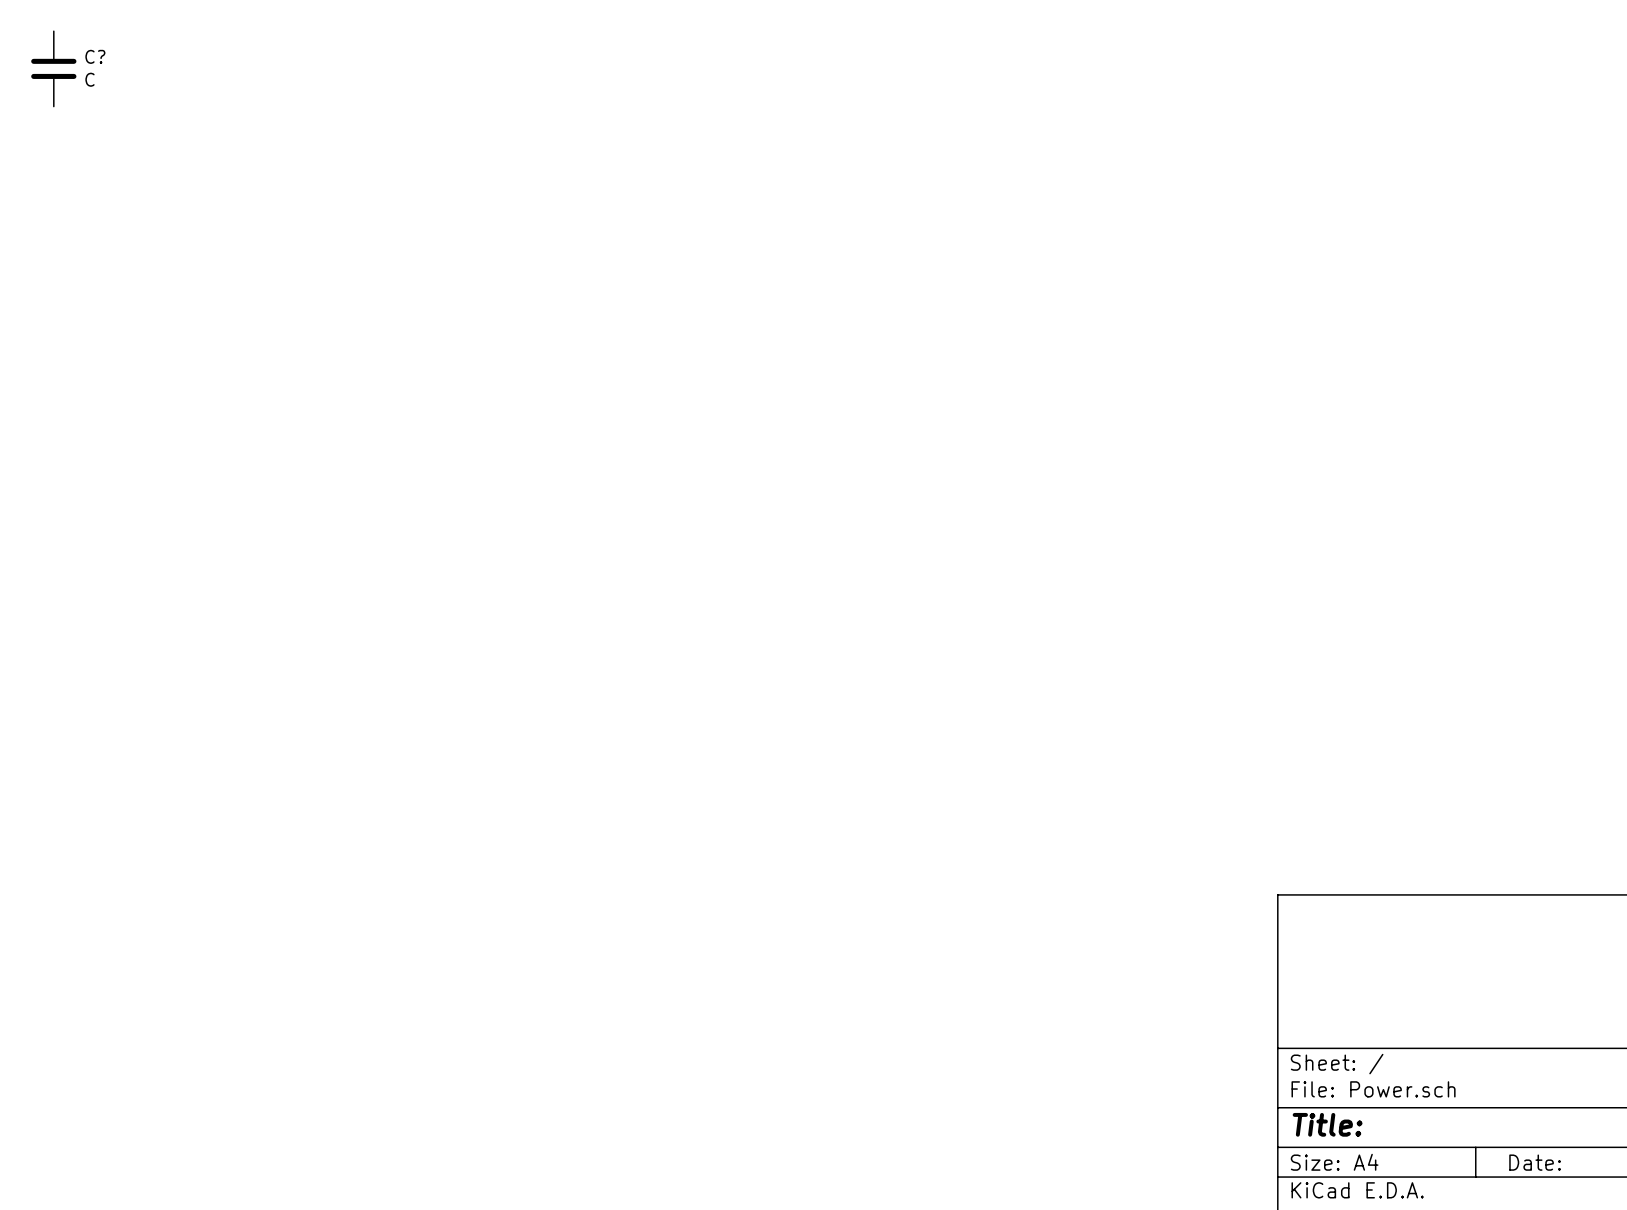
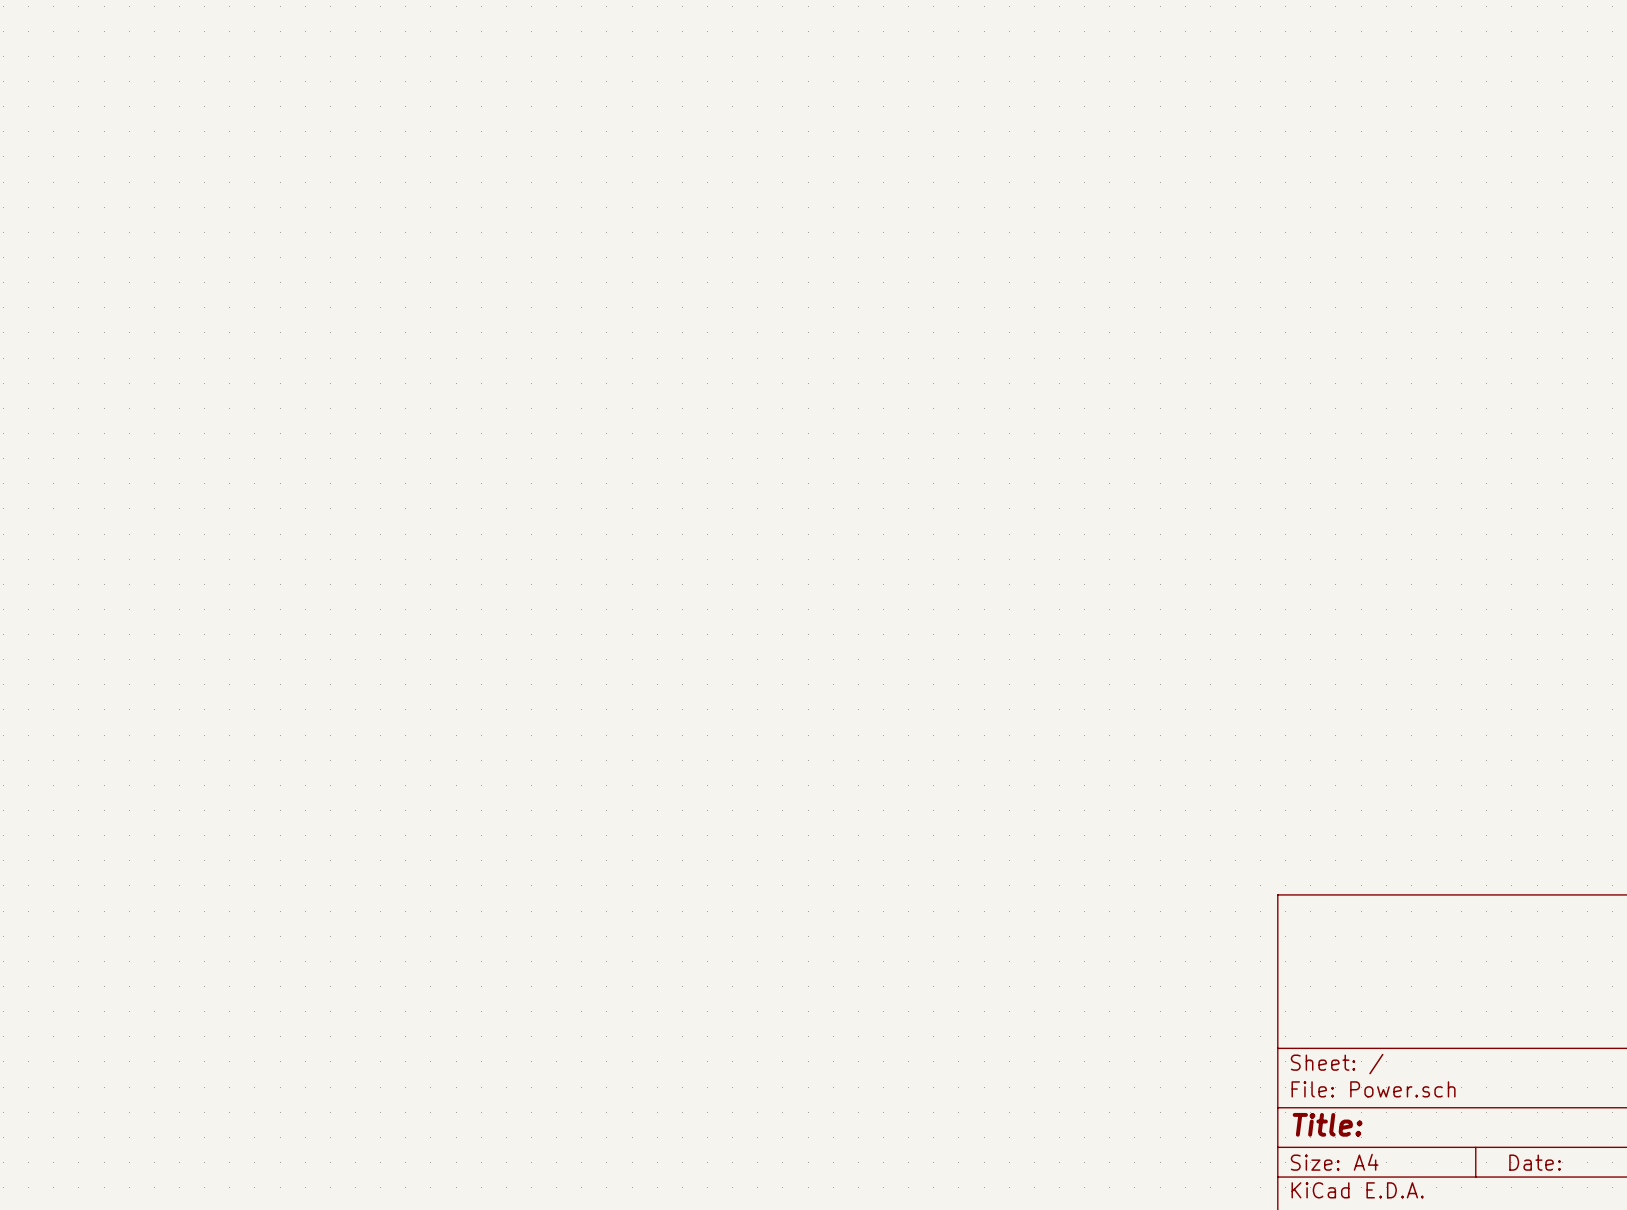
C?: C (53, 68) -> none

